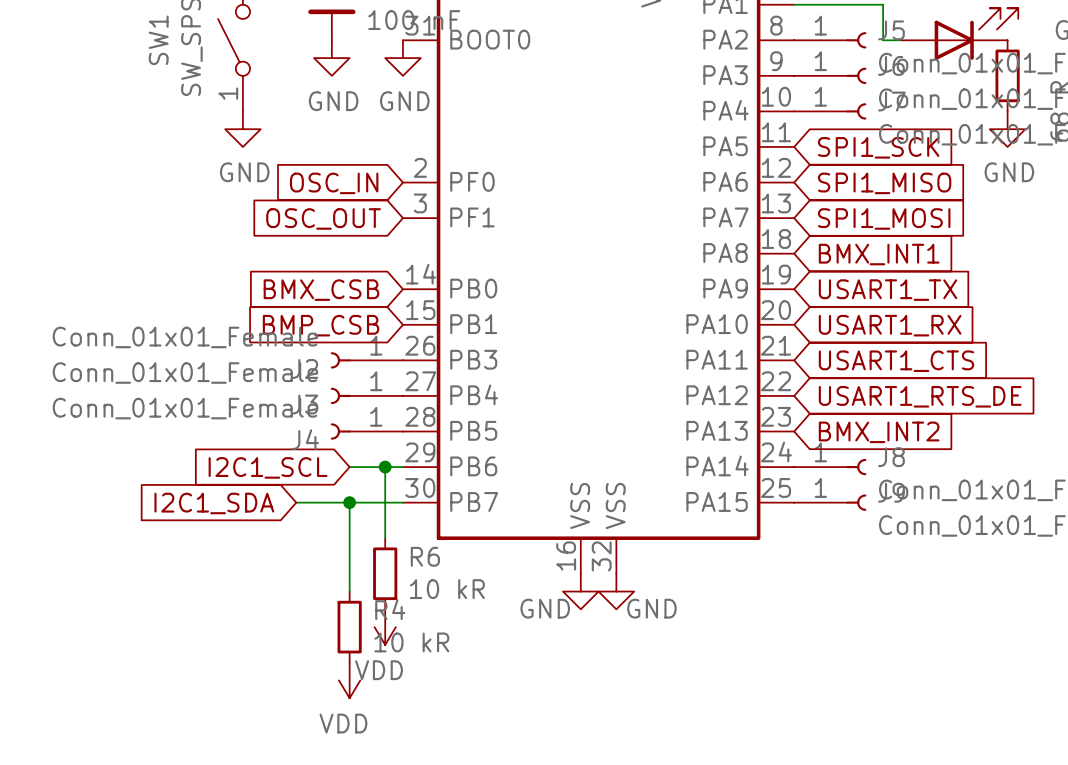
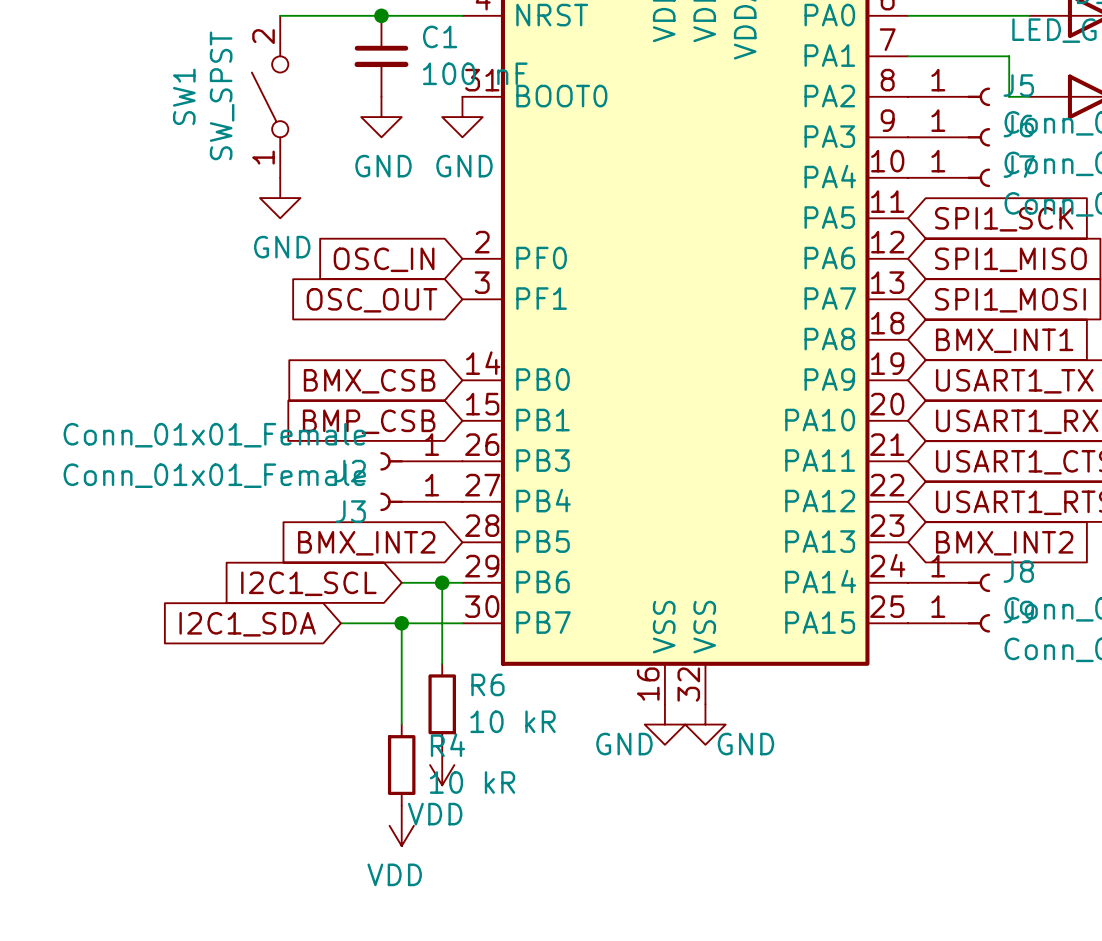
J4: Conn_01x01_Female (366, 431) -> none
global label: none -> BMX_INT2 (366, 543)

